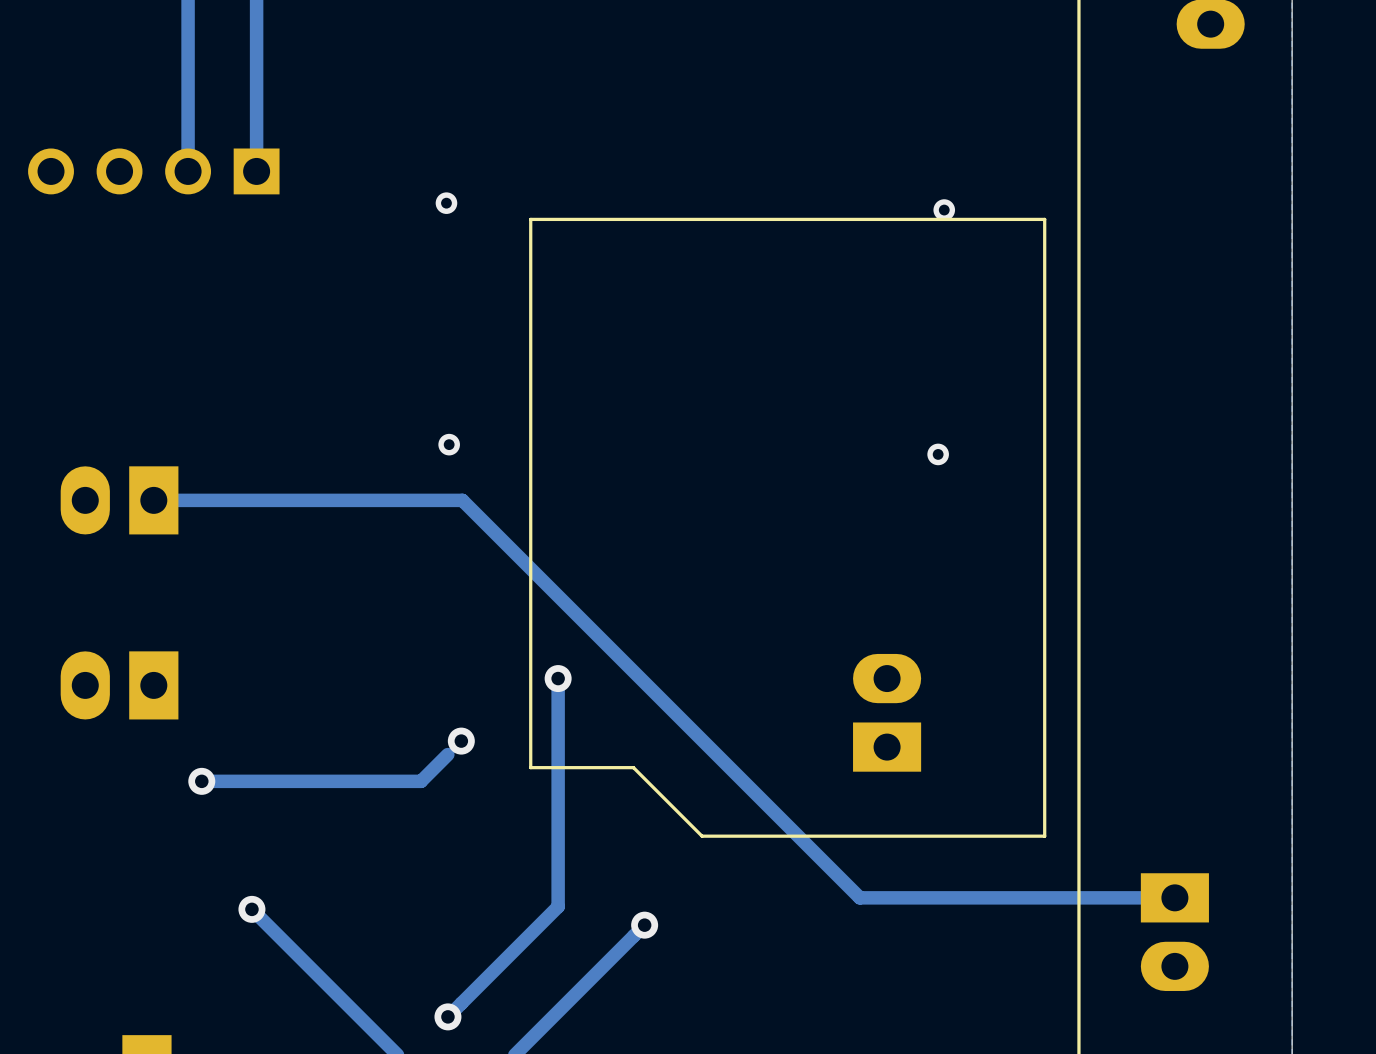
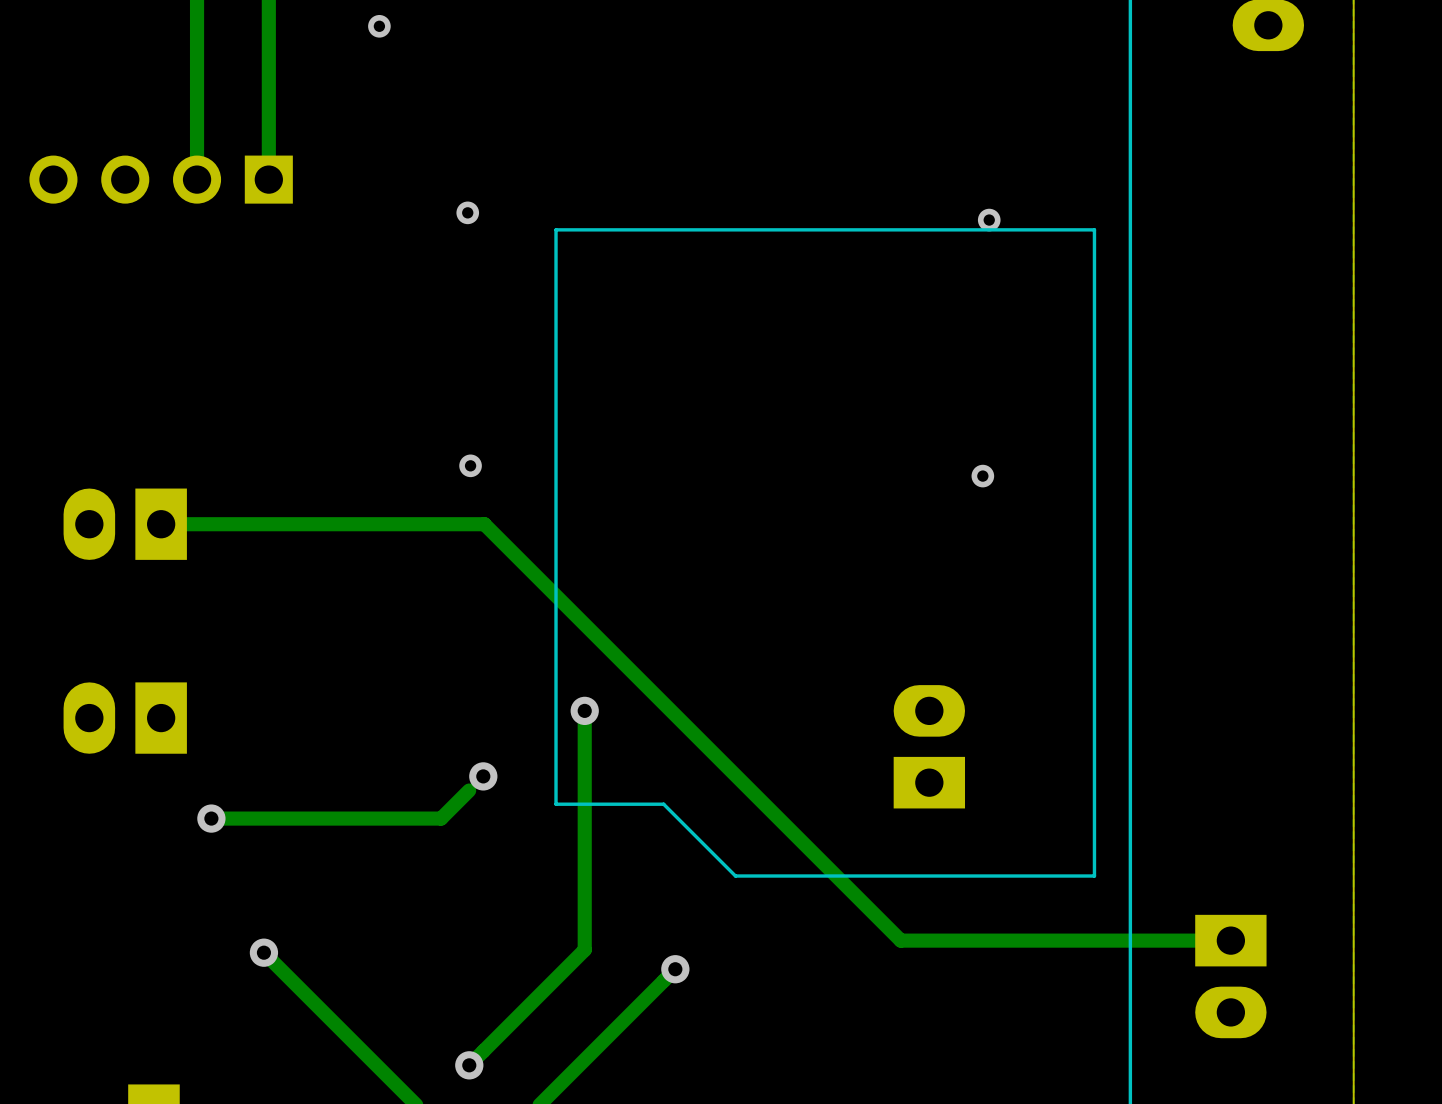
via: none -> (379, 26)

